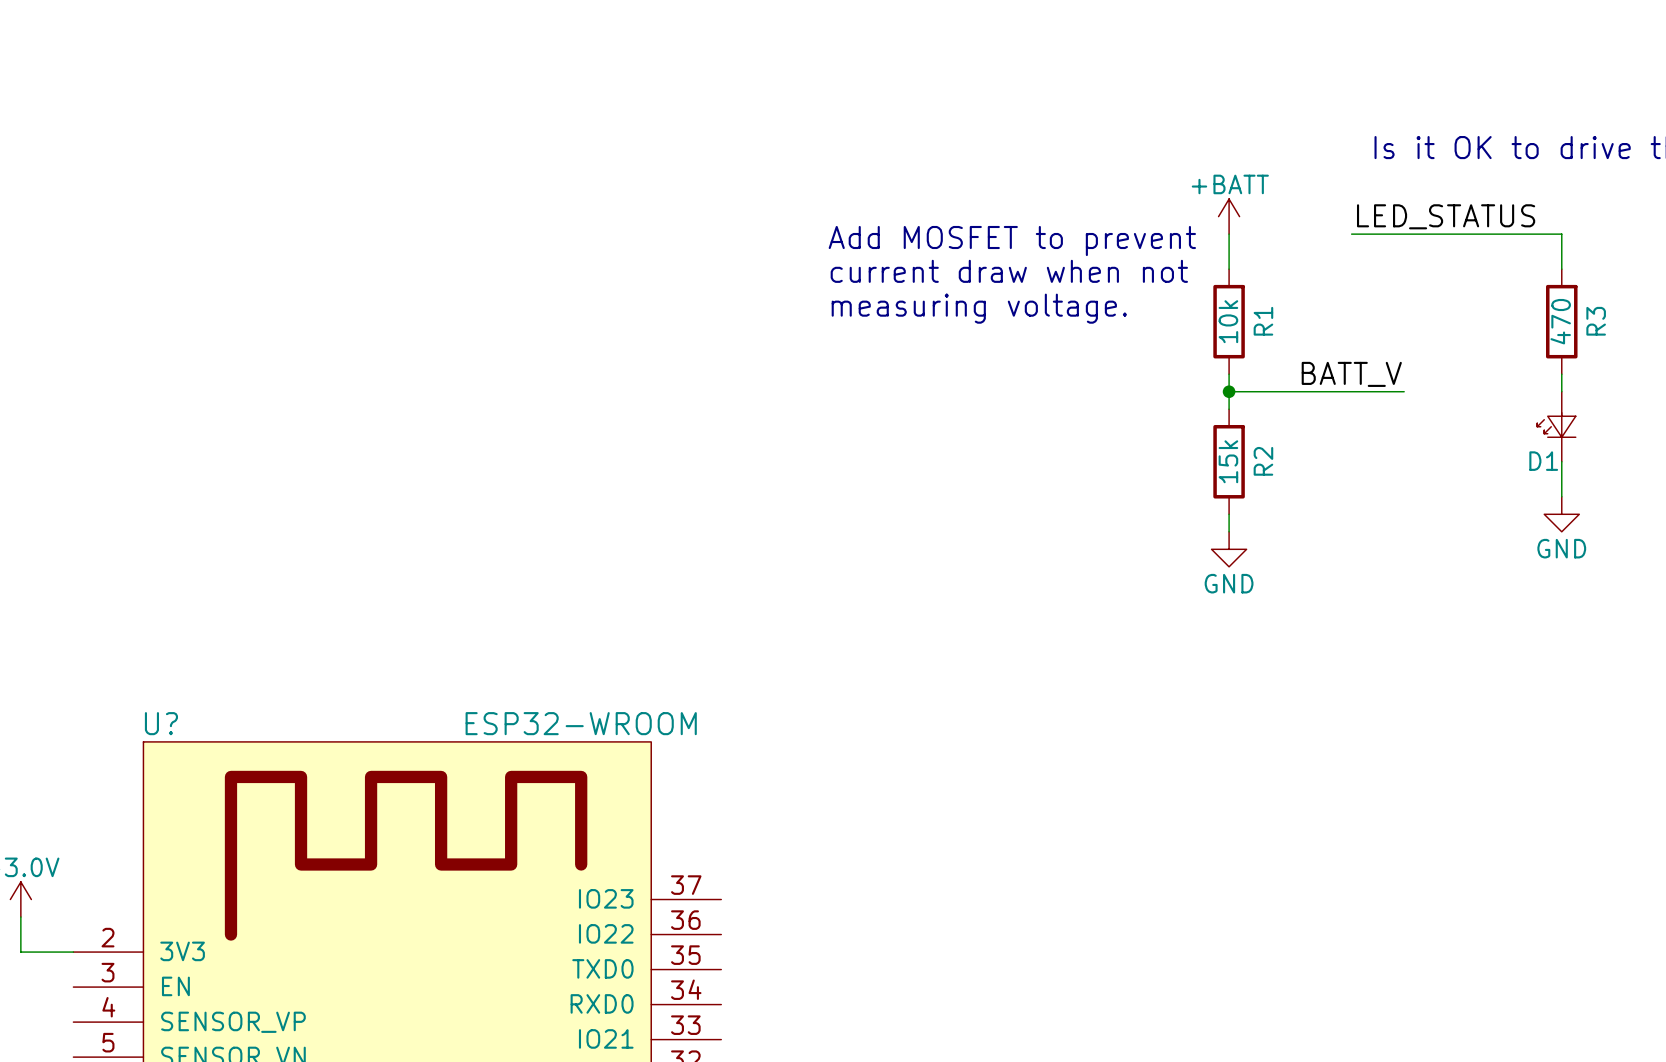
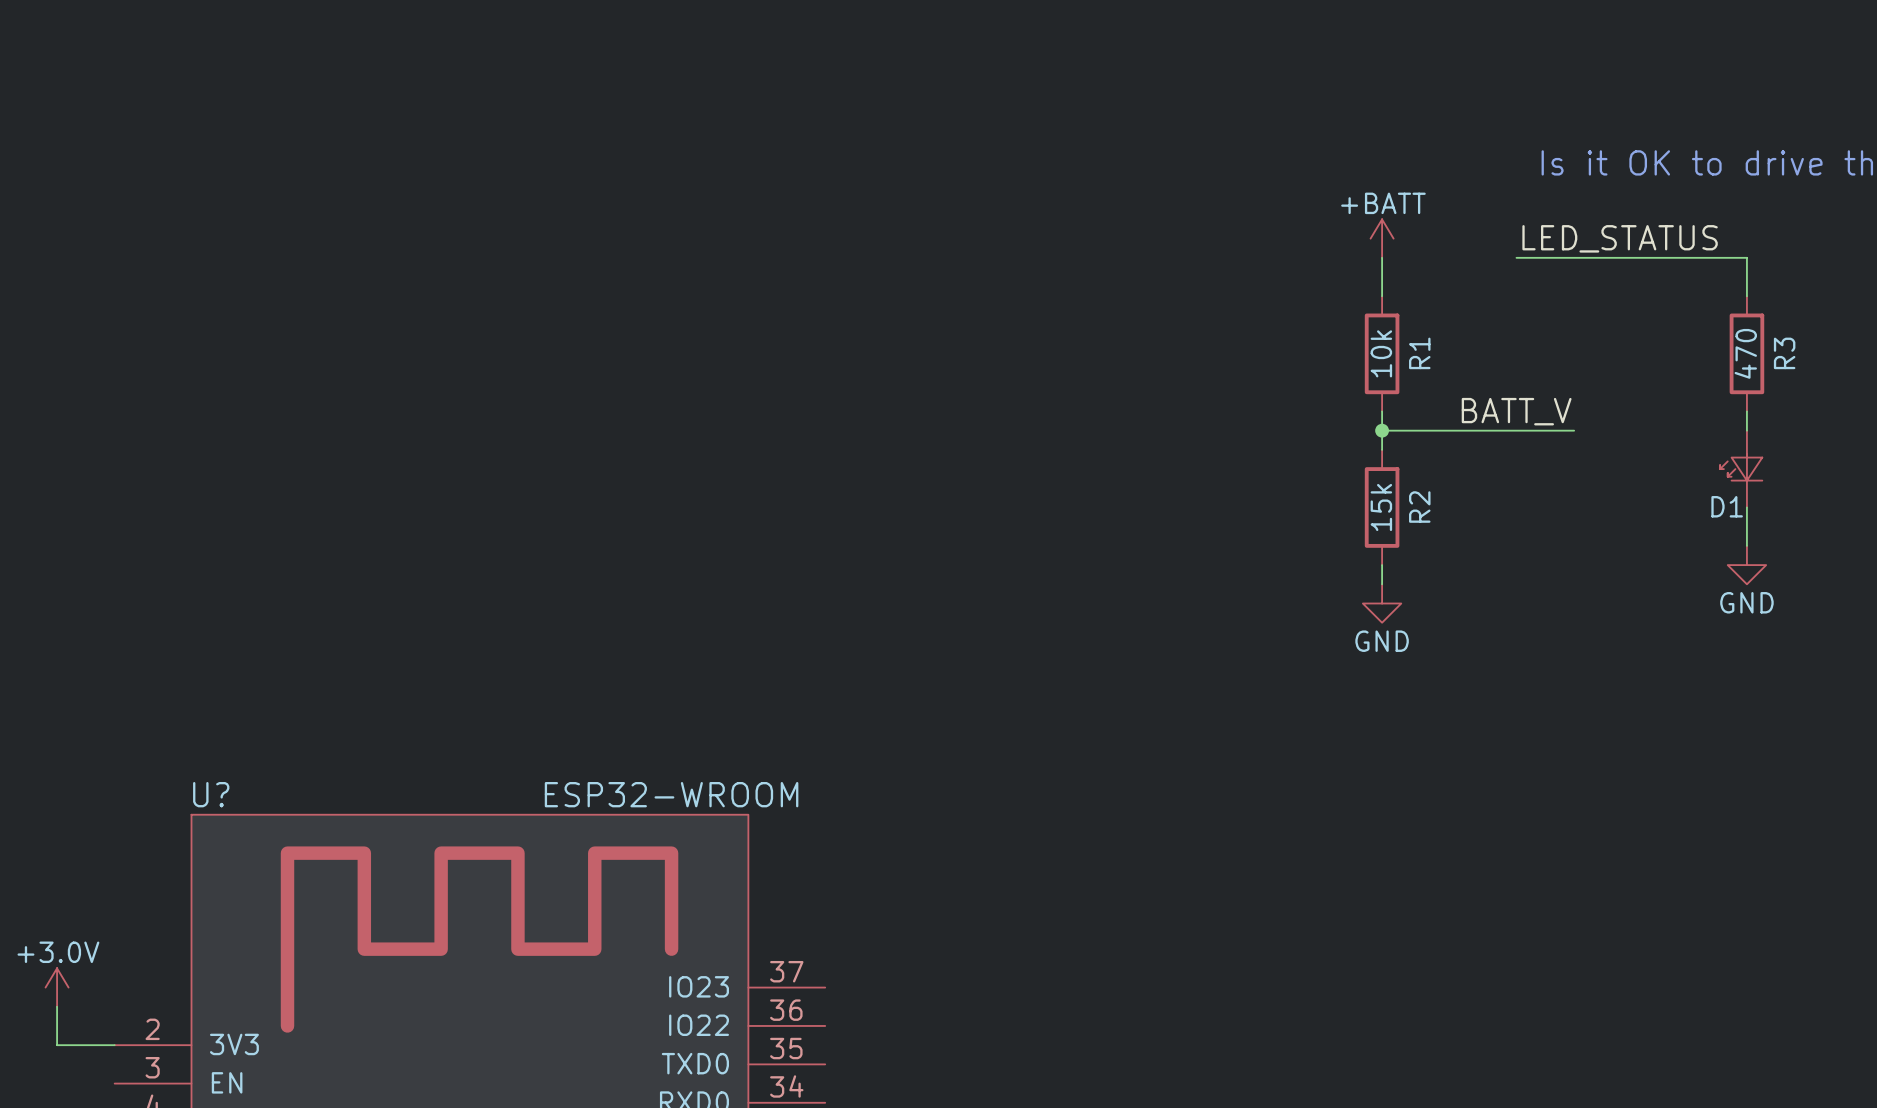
text: Add MOSFET to prevent (1012, 241) -> none
text: current draw when not (1009, 271) -> none
text: measuring voltage. (979, 308) -> none

